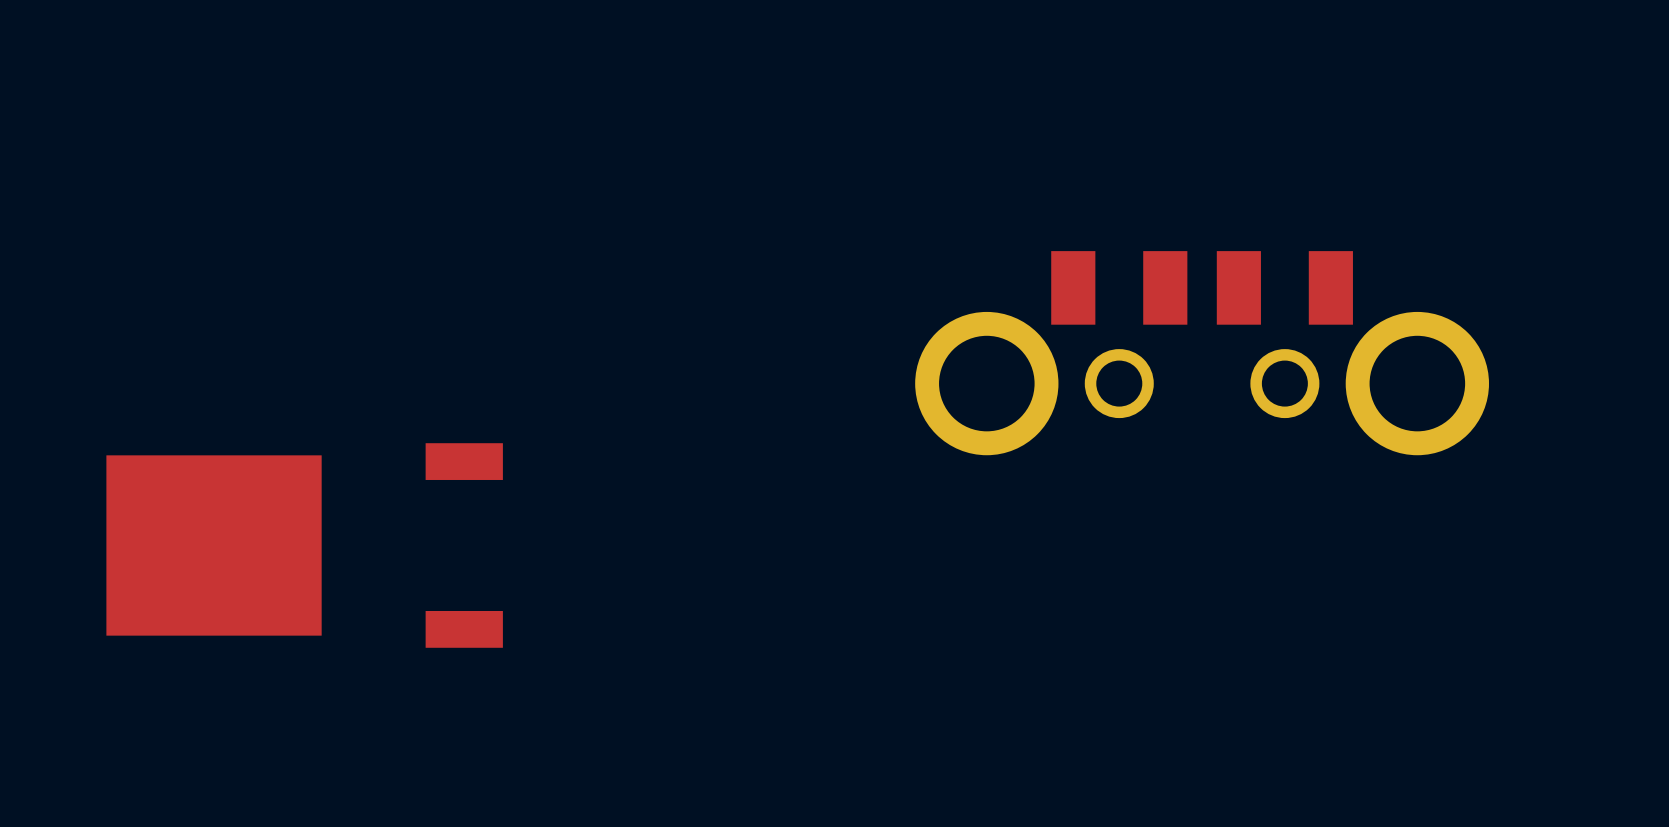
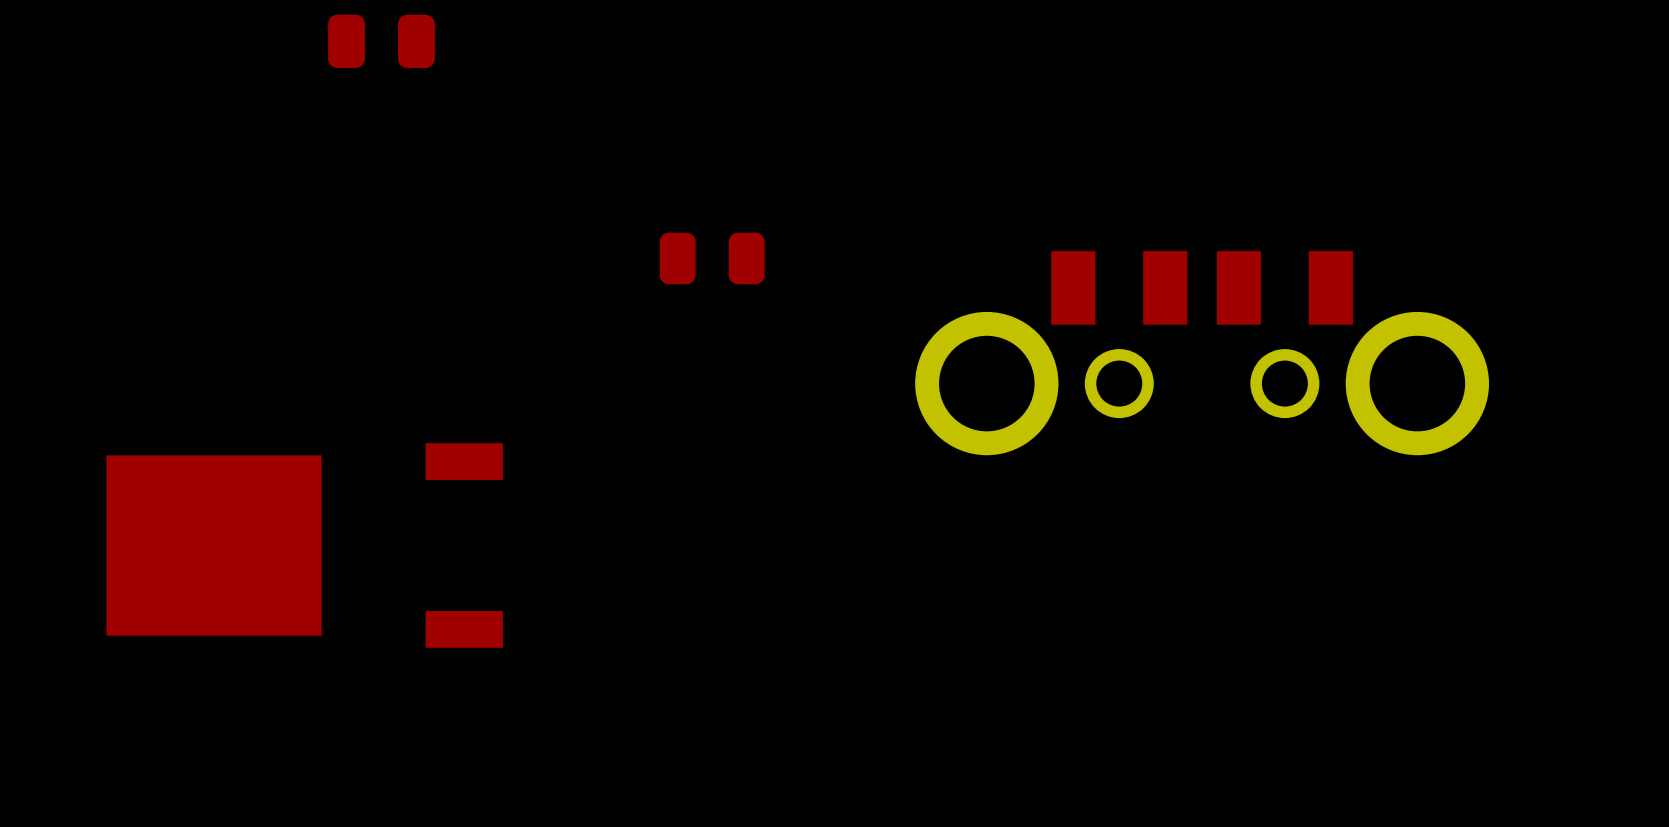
part: none -> (381, 41)
part: none -> (712, 258)

